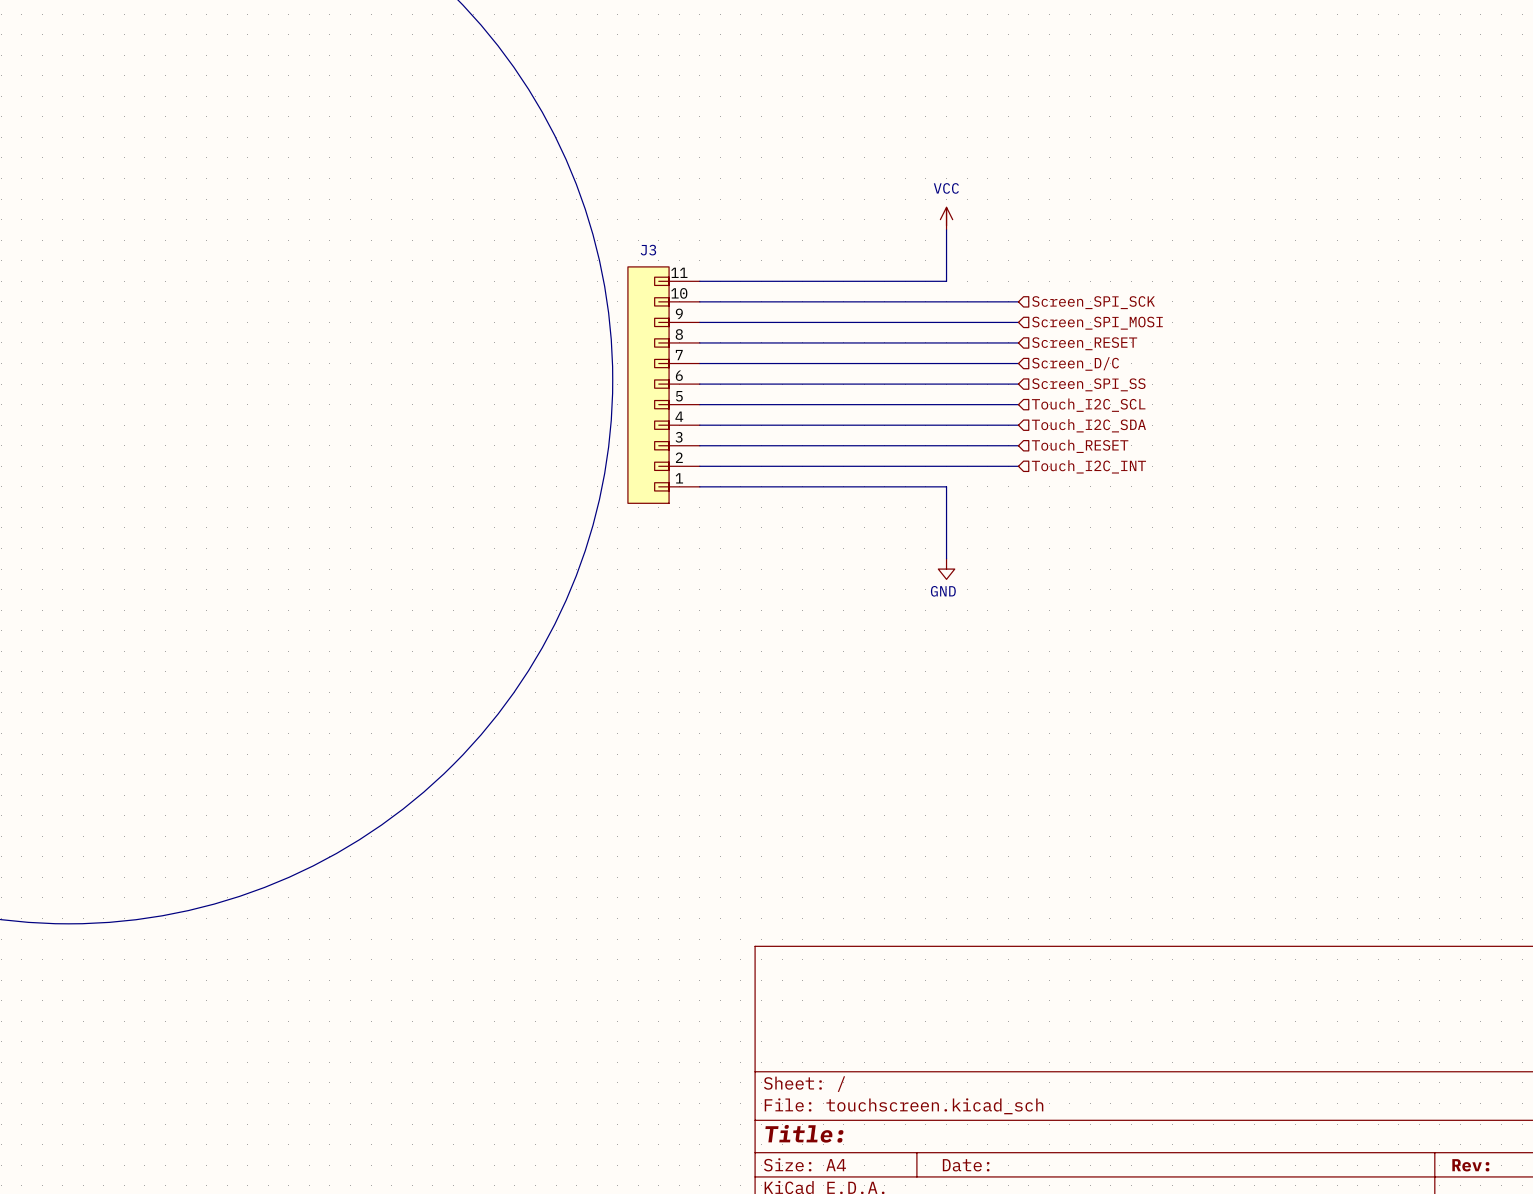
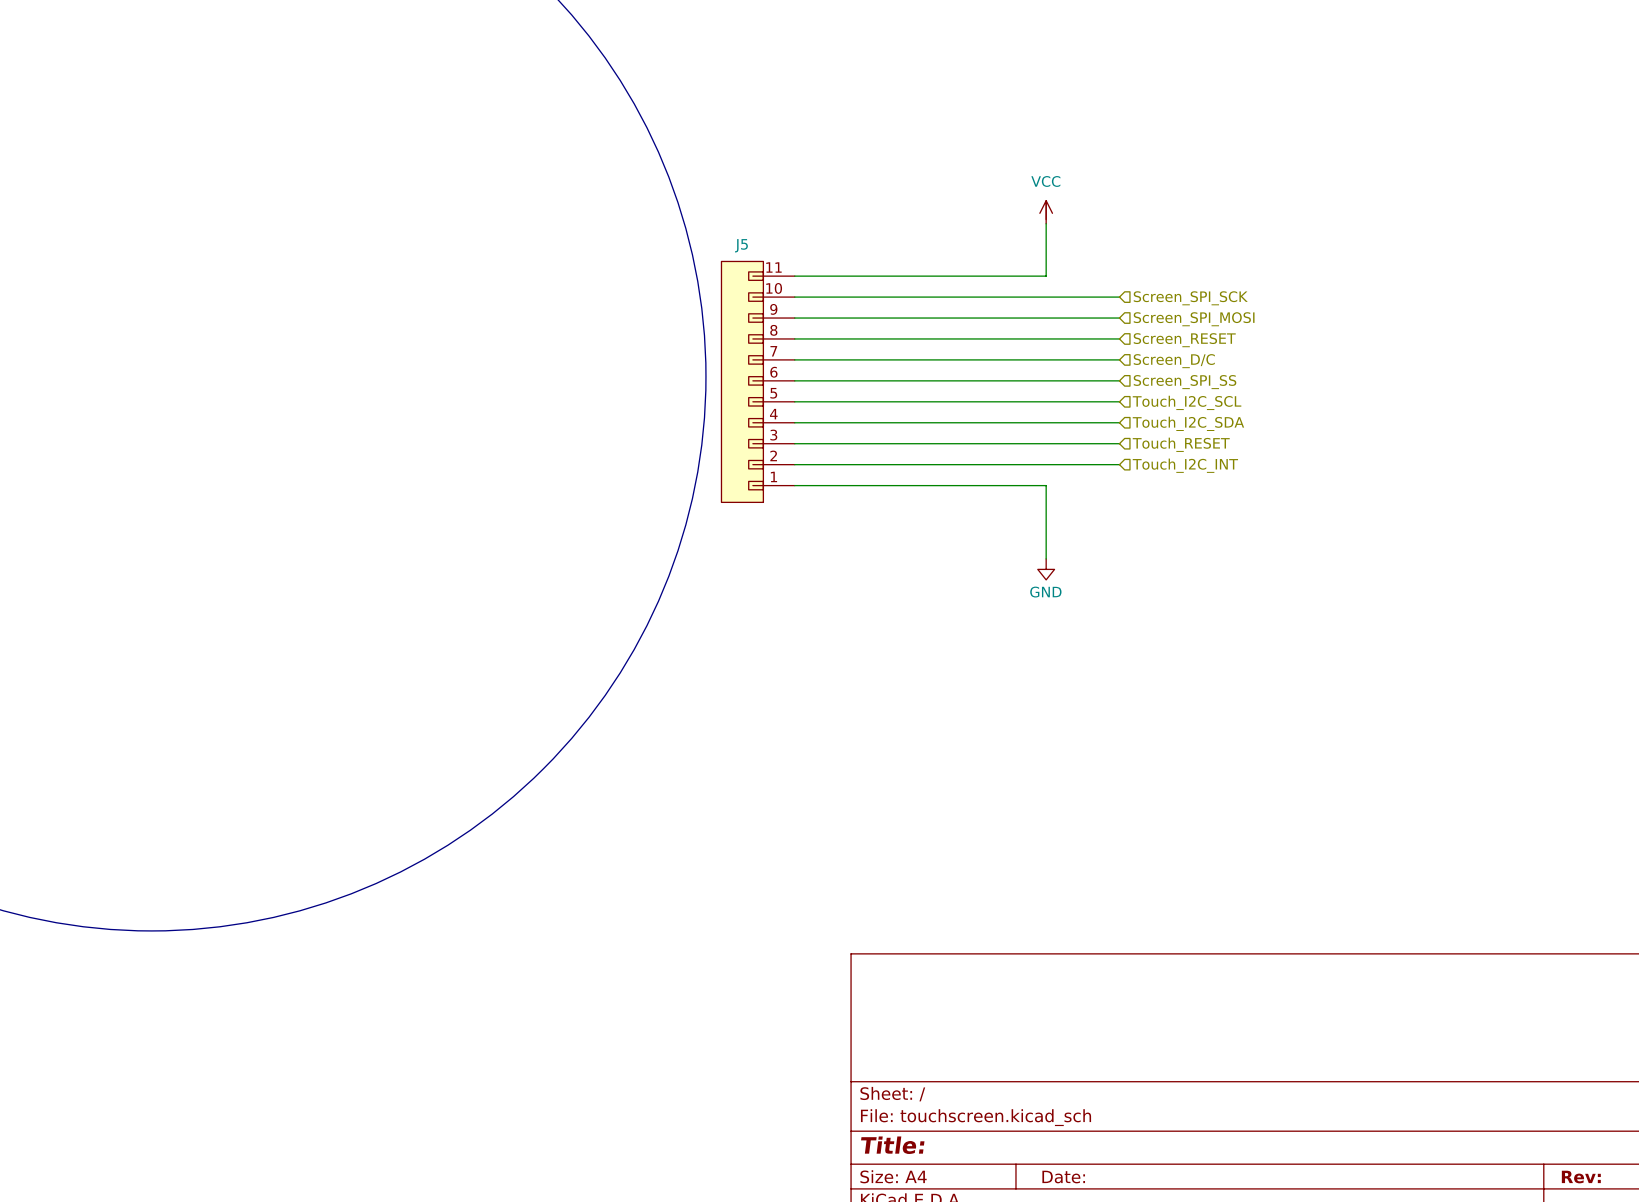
J3 name: J3 (648, 250) -> J5 (741, 245)

